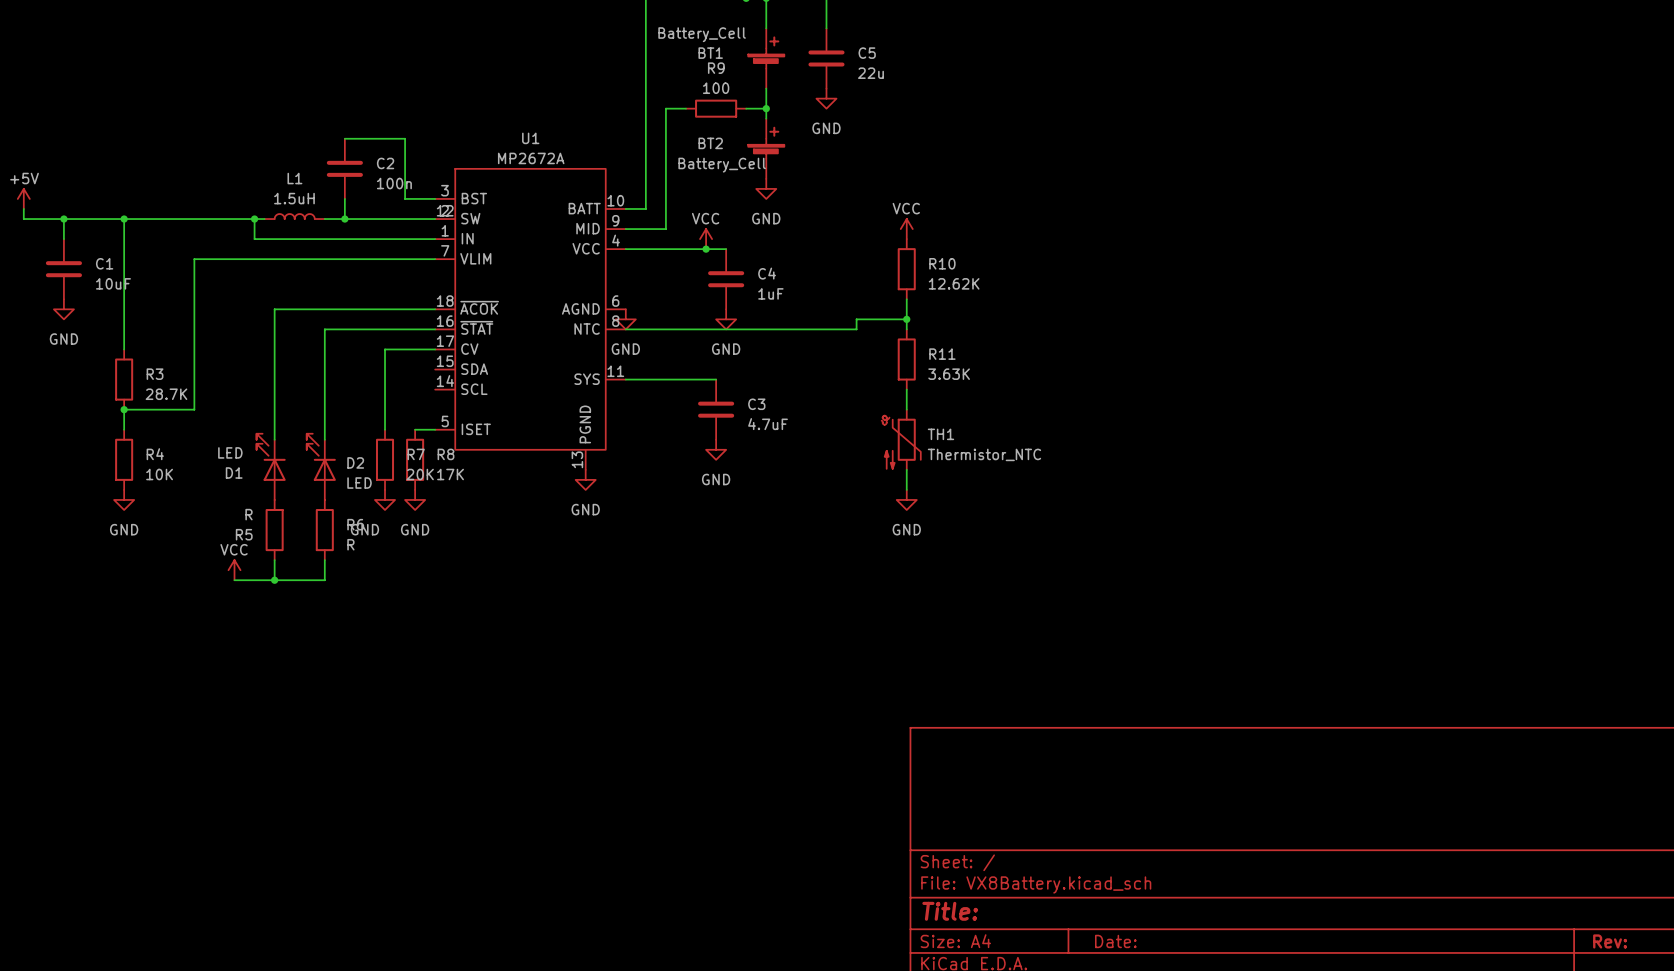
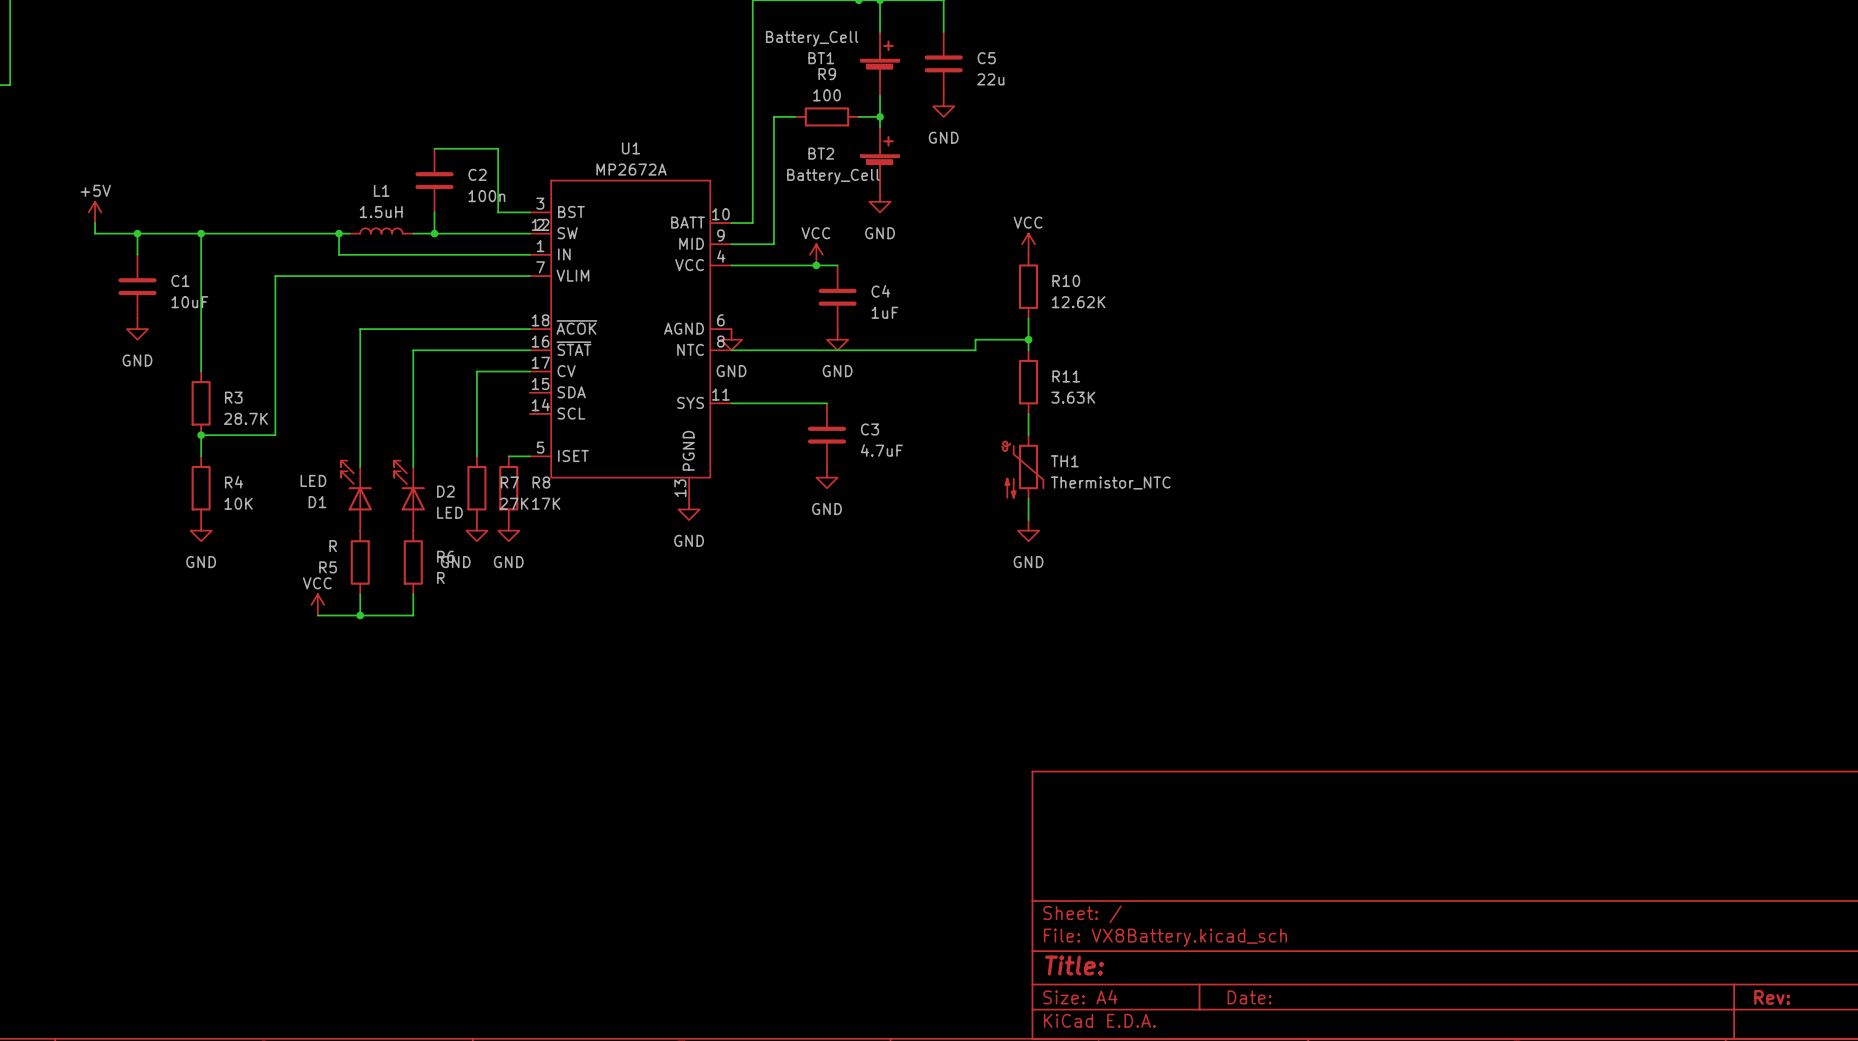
R7 value: 20K (420, 474) -> 27K (514, 503)

